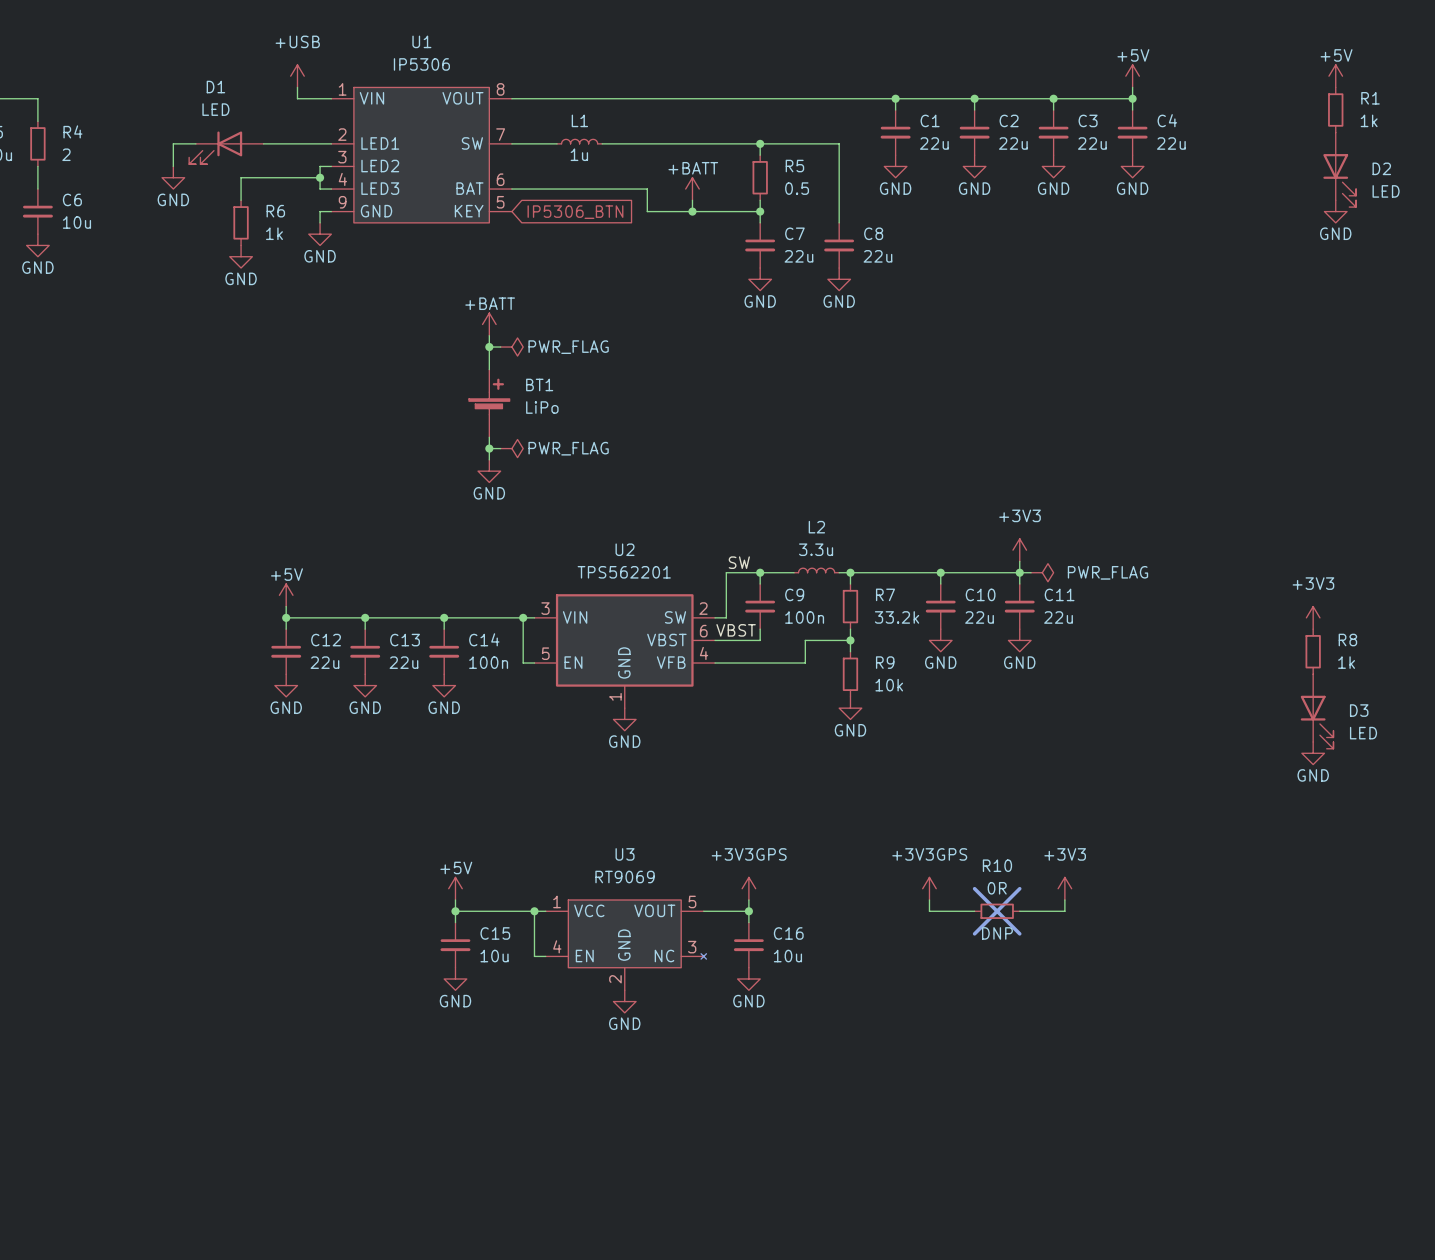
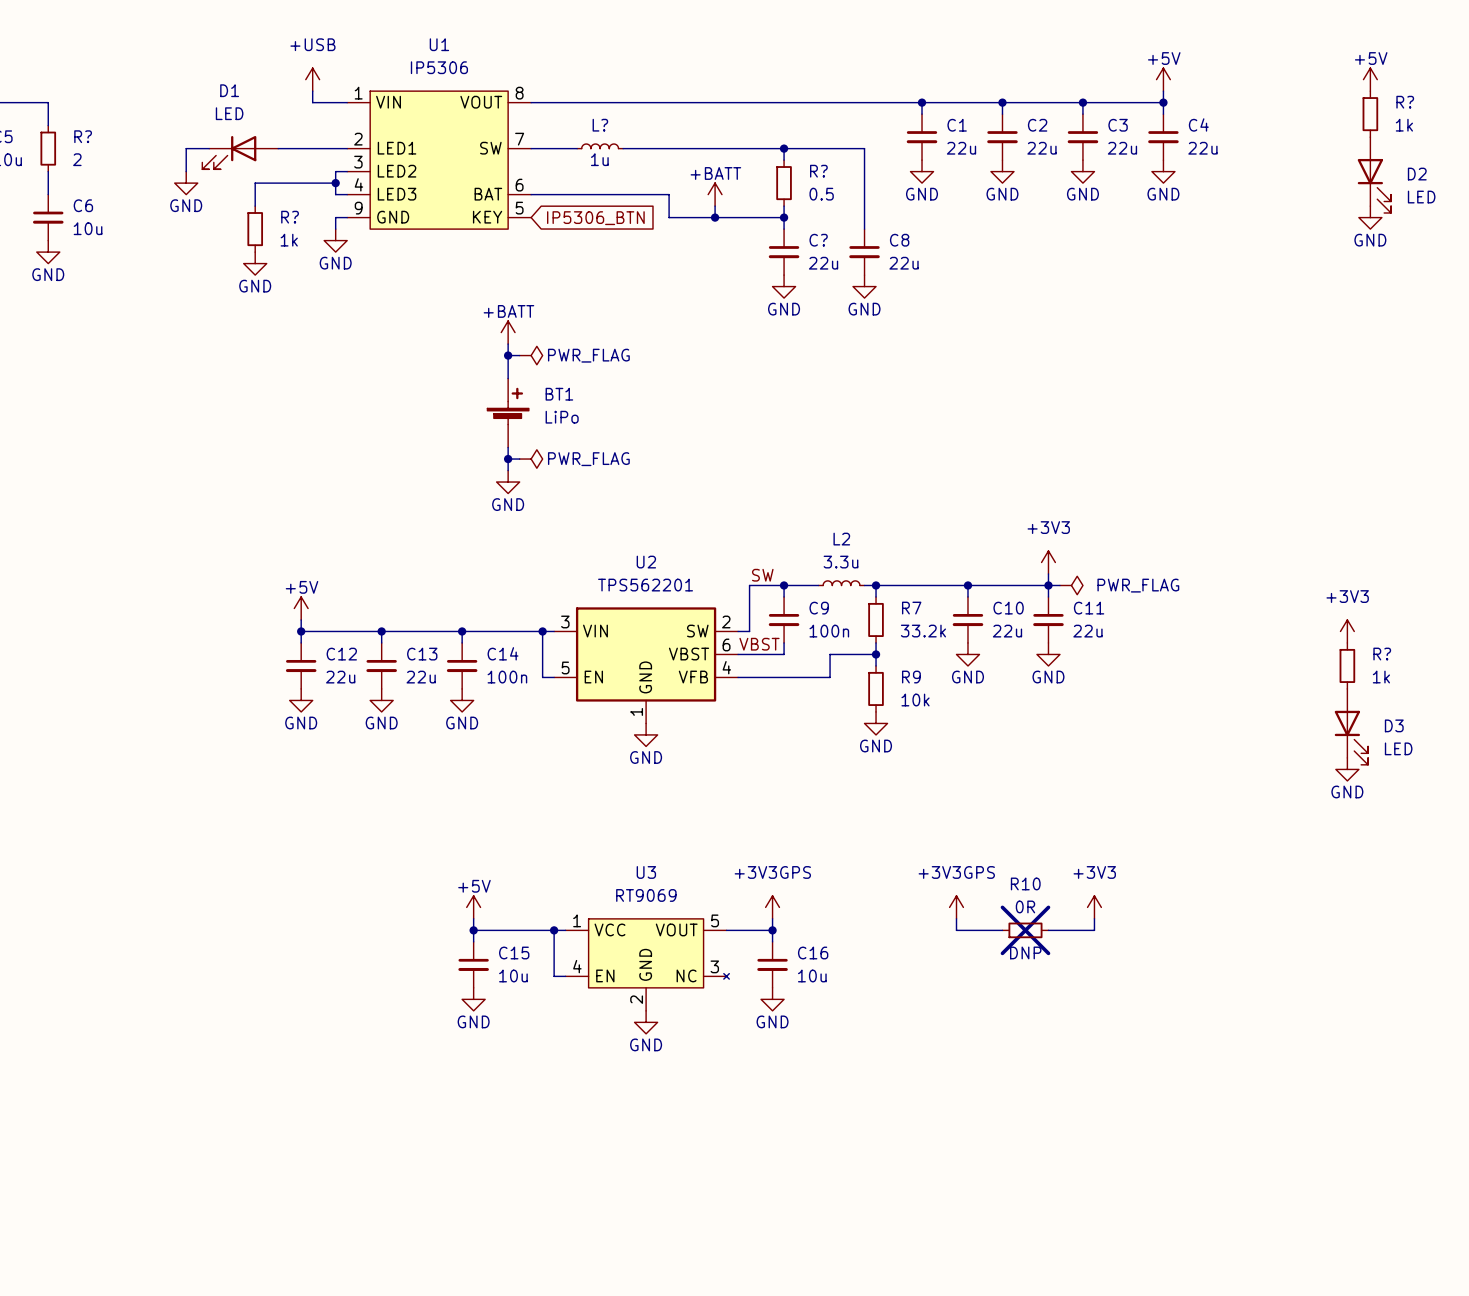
R1 name: R1 (1370, 98) -> R? (1405, 102)
R4 name: R4 (72, 131) -> R? (83, 136)
L1: 1u (579, 141) -> none
L?: none -> 1u (600, 146)
R5 name: R5 (794, 166) -> R? (818, 171)
R6 name: R6 (275, 211) -> R? (290, 217)
C7 name: C7 (794, 233) -> C? (818, 240)
R8 name: R8 (1347, 640) -> R? (1382, 654)

